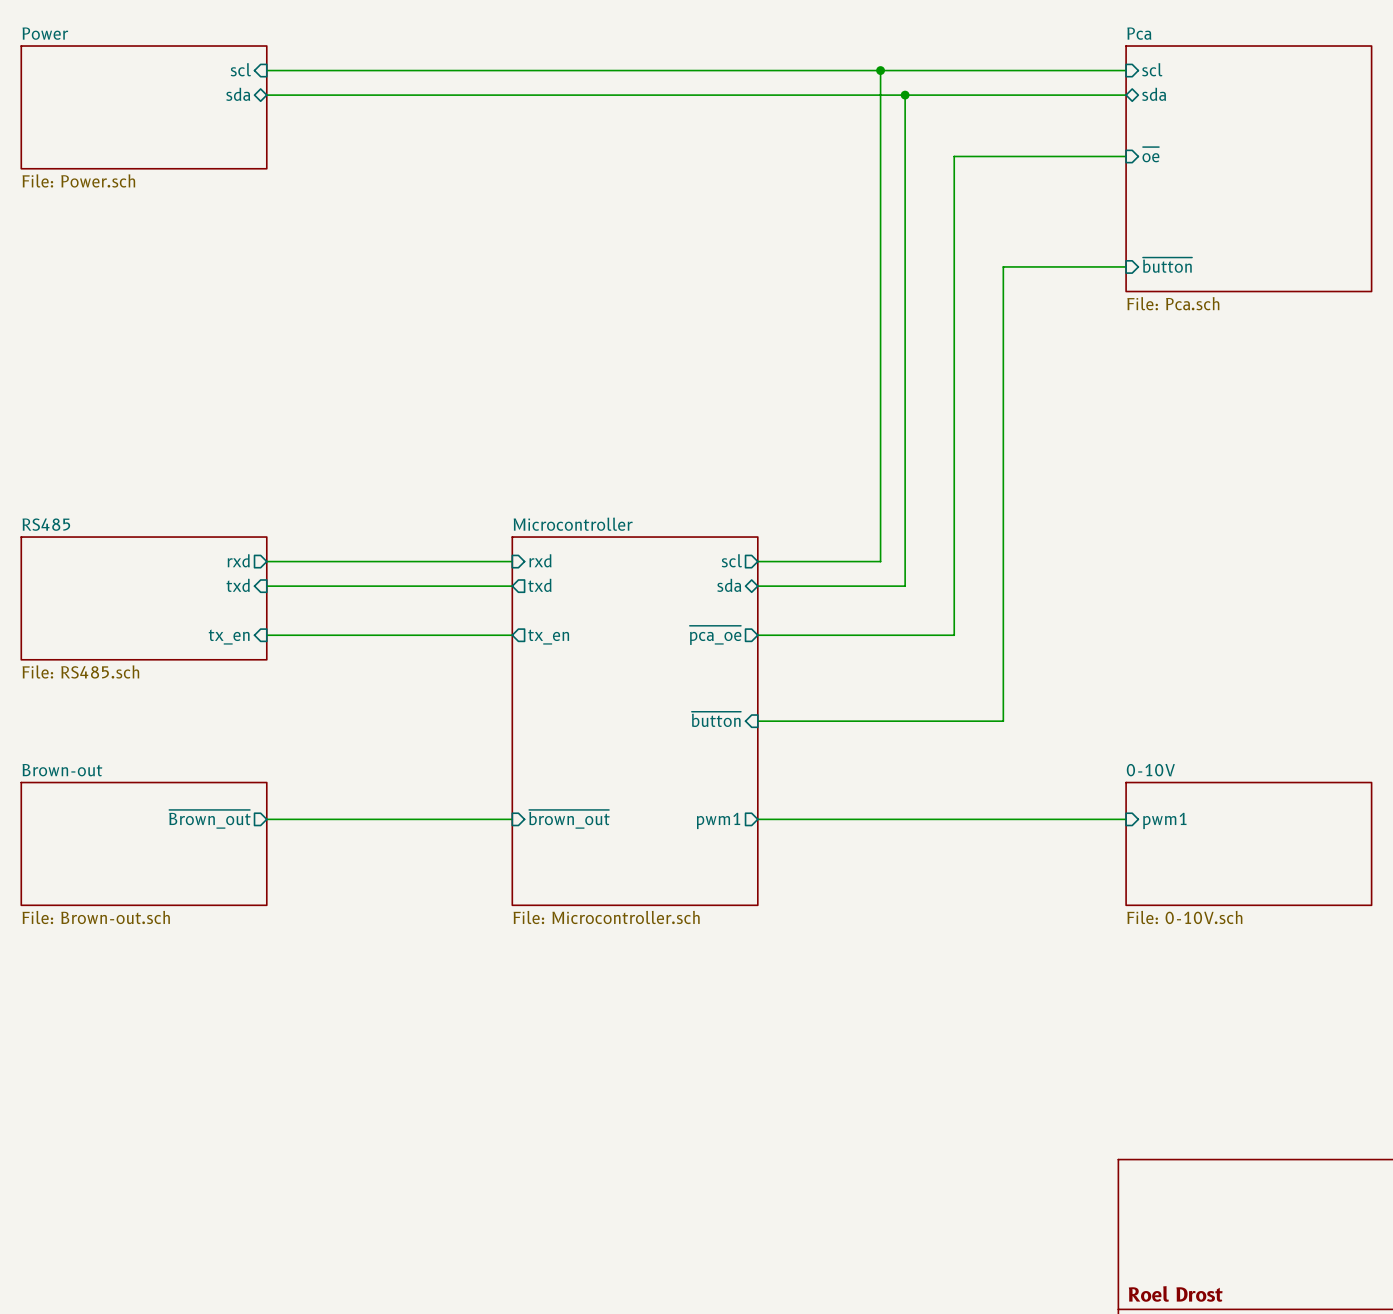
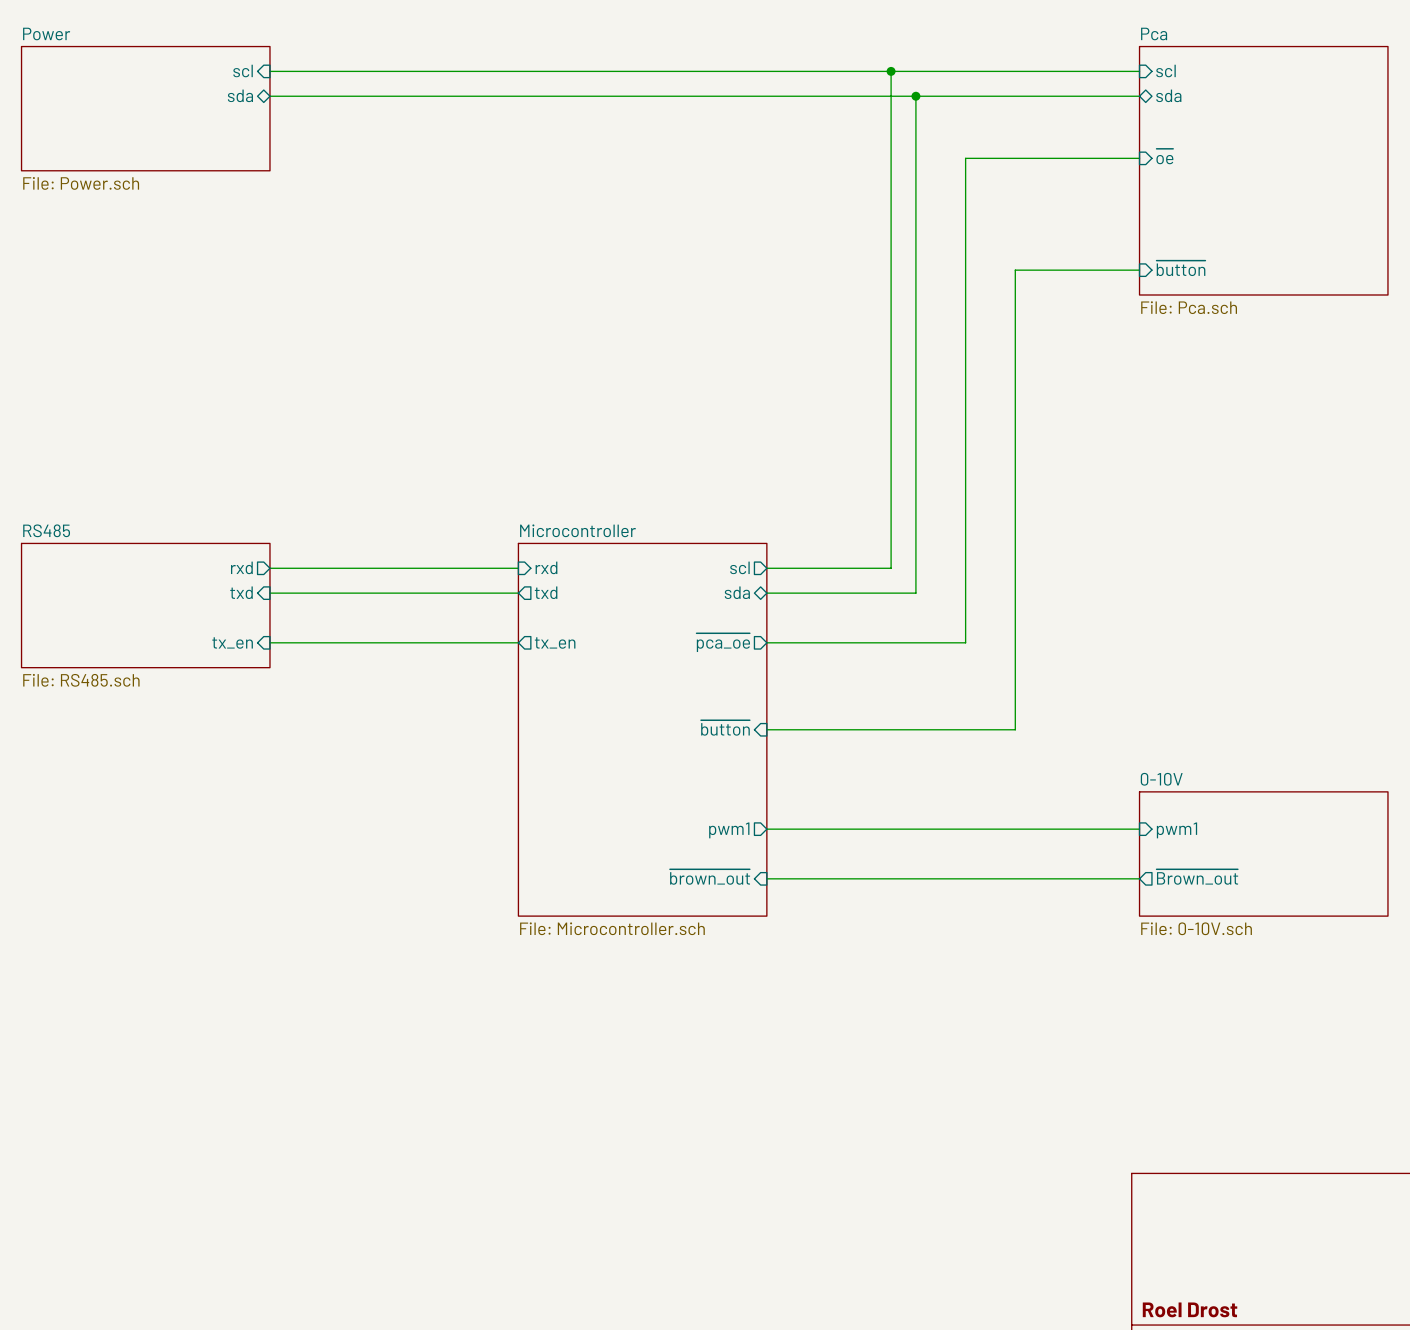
sheet pin: ~{Brown_out} (209, 819) -> none
wire: (266, 819) (512, 819) -> none
sheet pin rotation: 0° (569, 819) -> 180° (710, 877)
sheet Brown-out: File: Brown-out.sch (144, 843) -> none
wire: none -> (766, 878) (1139, 878)
sheet pin: none -> ~{Brown_out} (1197, 877)

